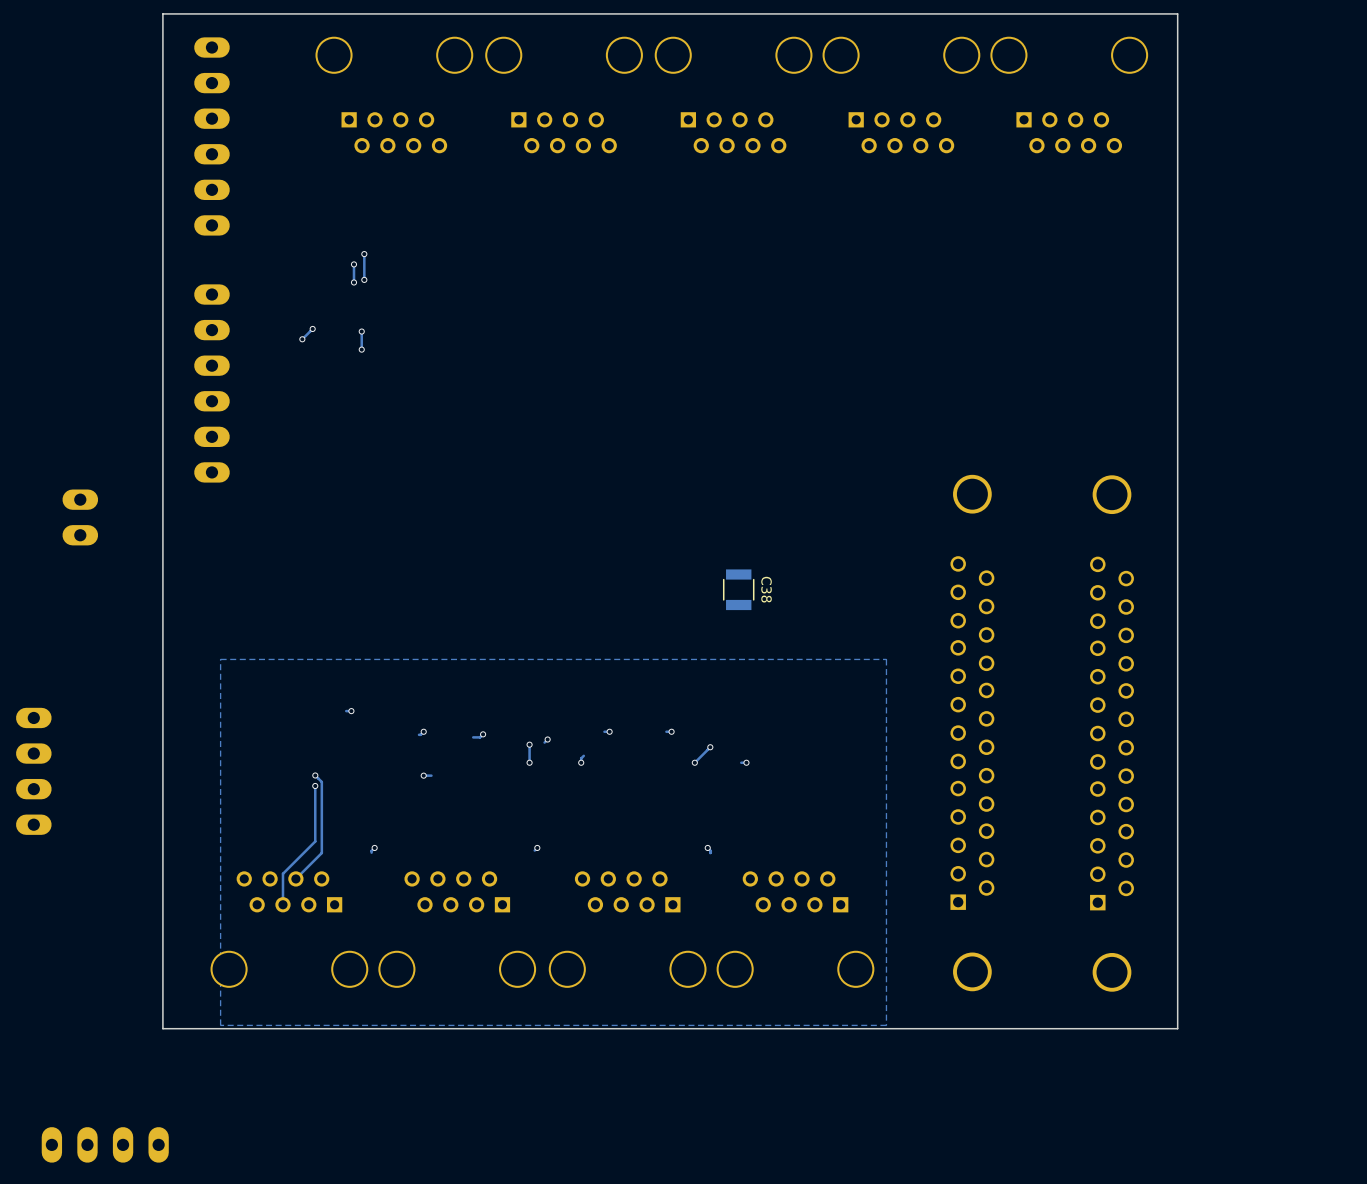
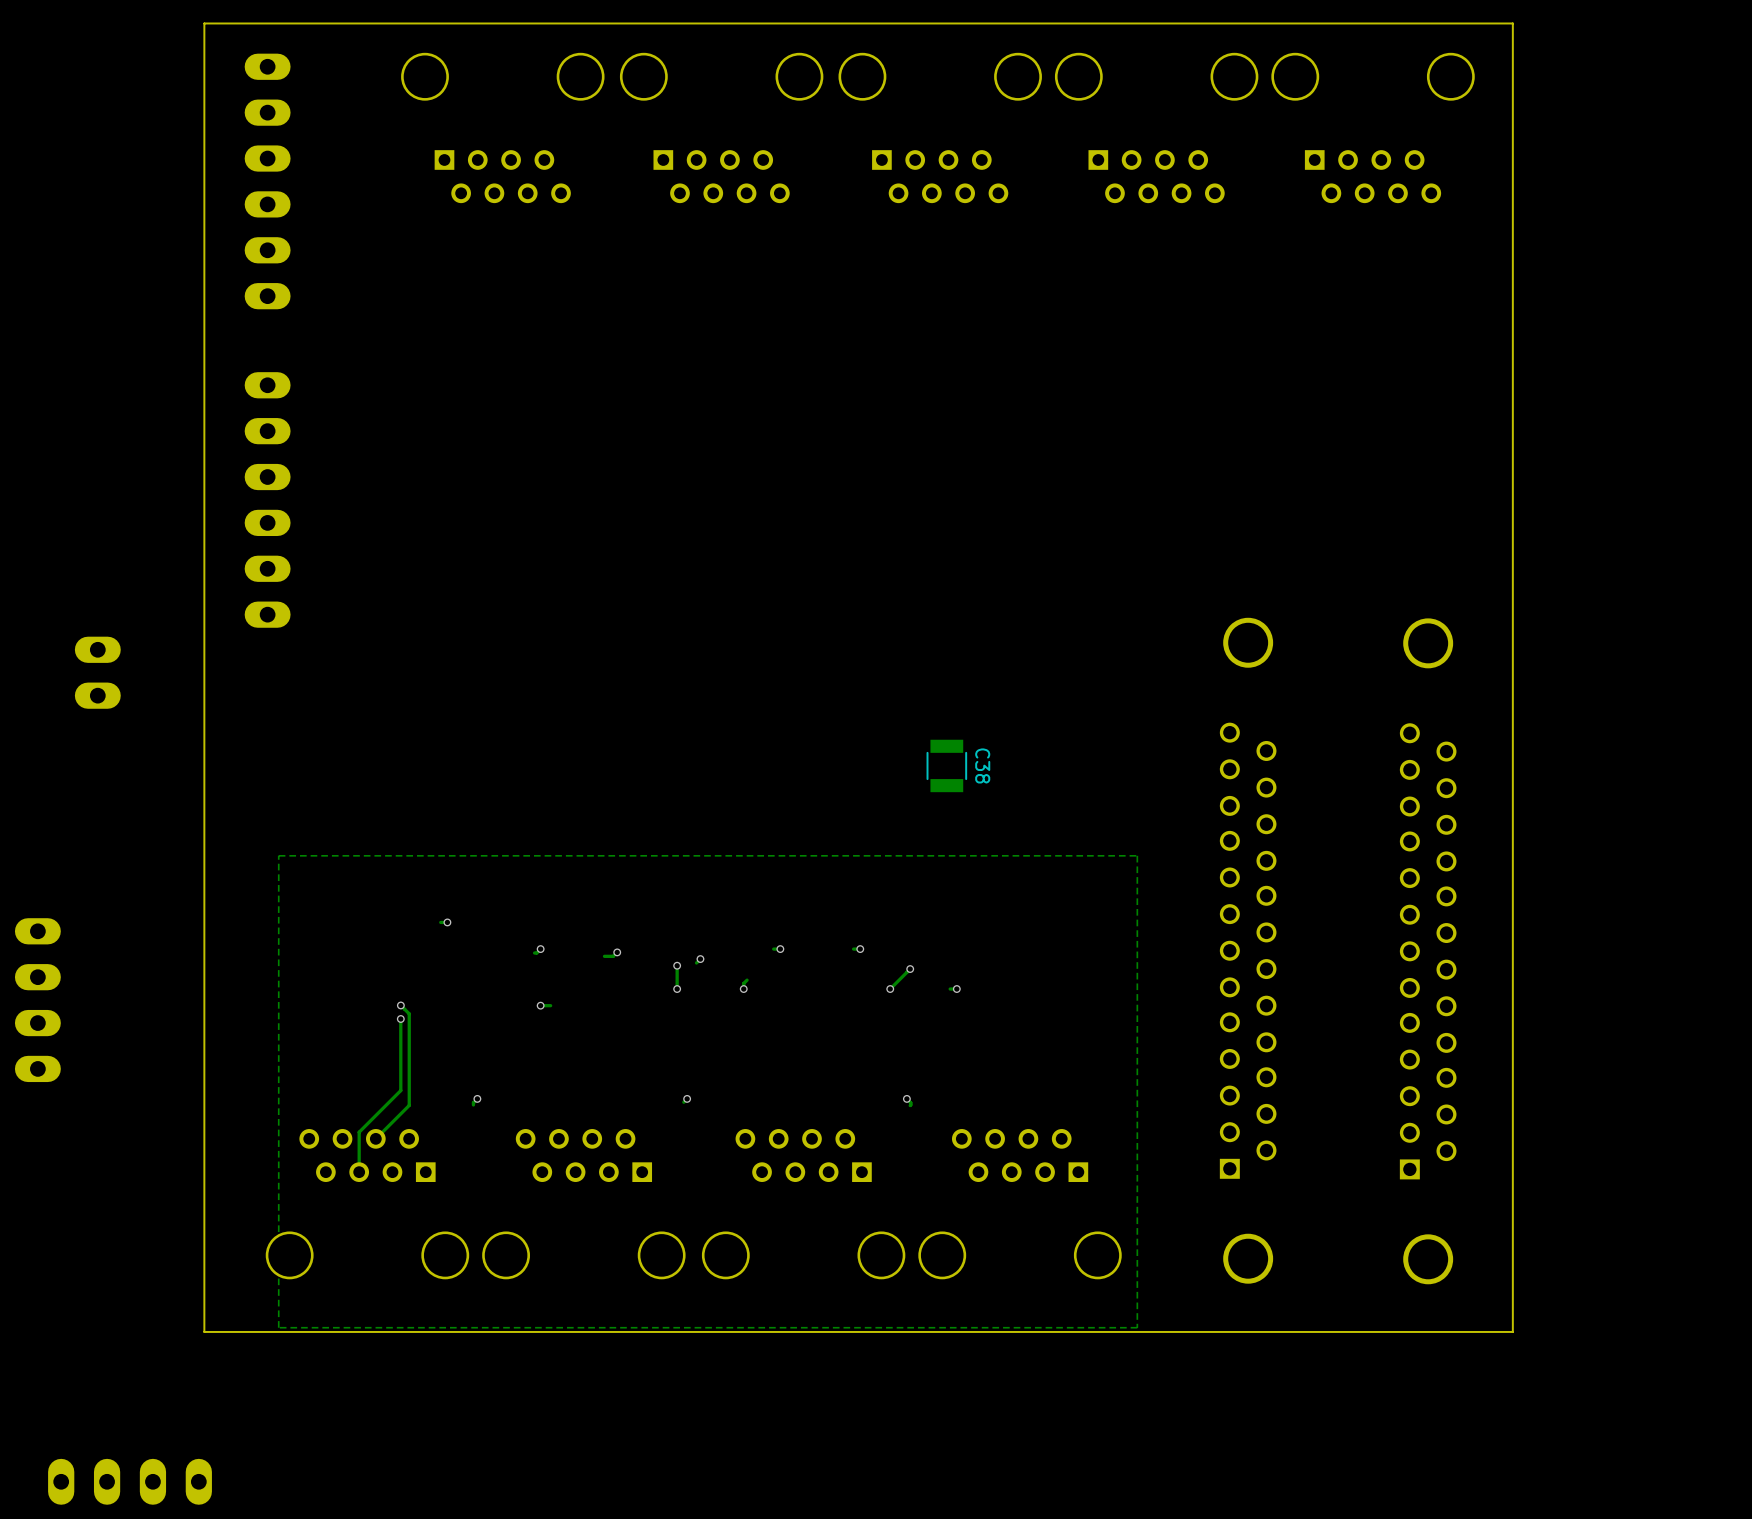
track: (364, 254) (364, 279) -> none
via: (364, 254) -> none
track: (353, 264) (353, 282) -> none
via: (353, 264) -> none
via: (364, 279) -> none
via: (353, 282) -> none
track: (312, 328) (302, 339) -> none
via: (312, 328) -> none
track: (361, 331) (361, 349) -> none
via: (361, 331) -> none
via: (302, 339) -> none
via: (361, 349) -> none

